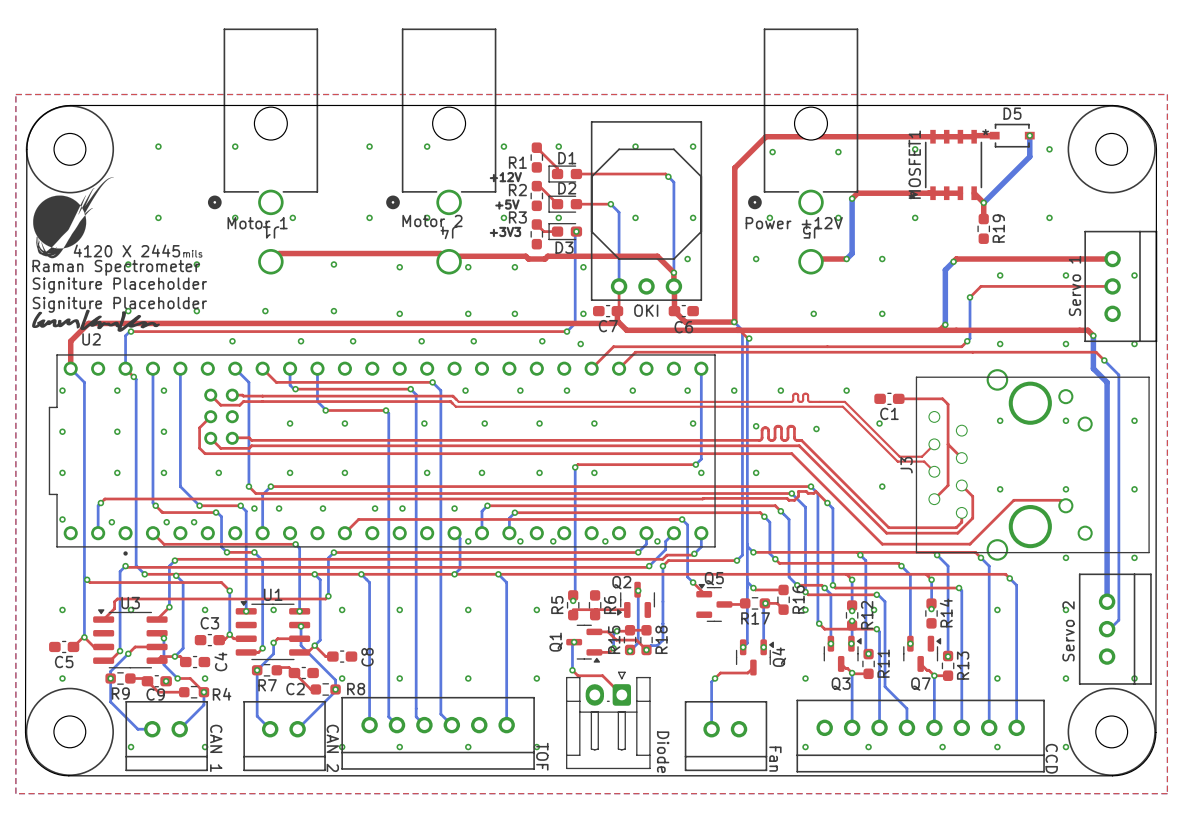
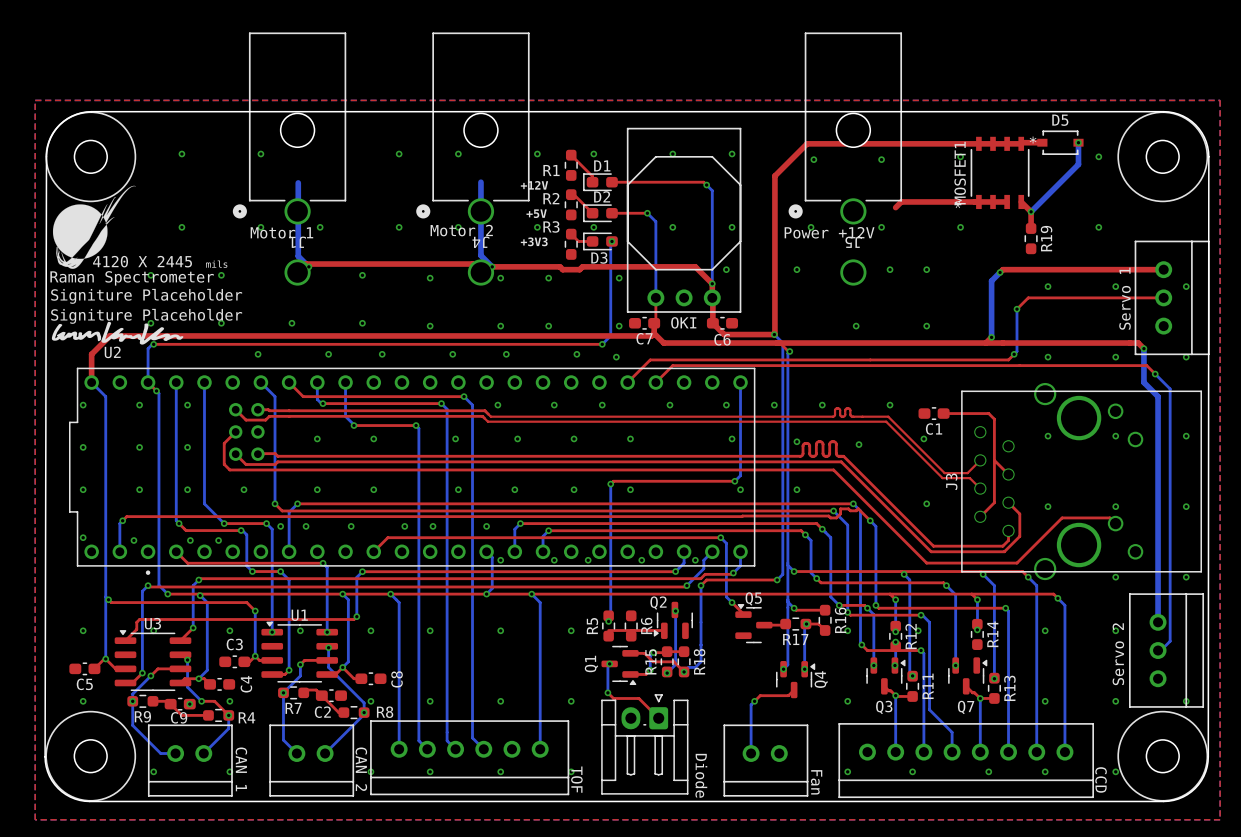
bottom track: none -> (298, 182) (298, 256) (308, 266)
bottom track: none -> (480, 182) (480, 255) (492, 266)
bottom track: (852, 198) (852, 253) (846, 259) -> none
via: (852, 198) -> none
via: none -> (308, 266)
via: none -> (492, 266)
top track: (846, 259) (813, 259) (810, 261) -> none

